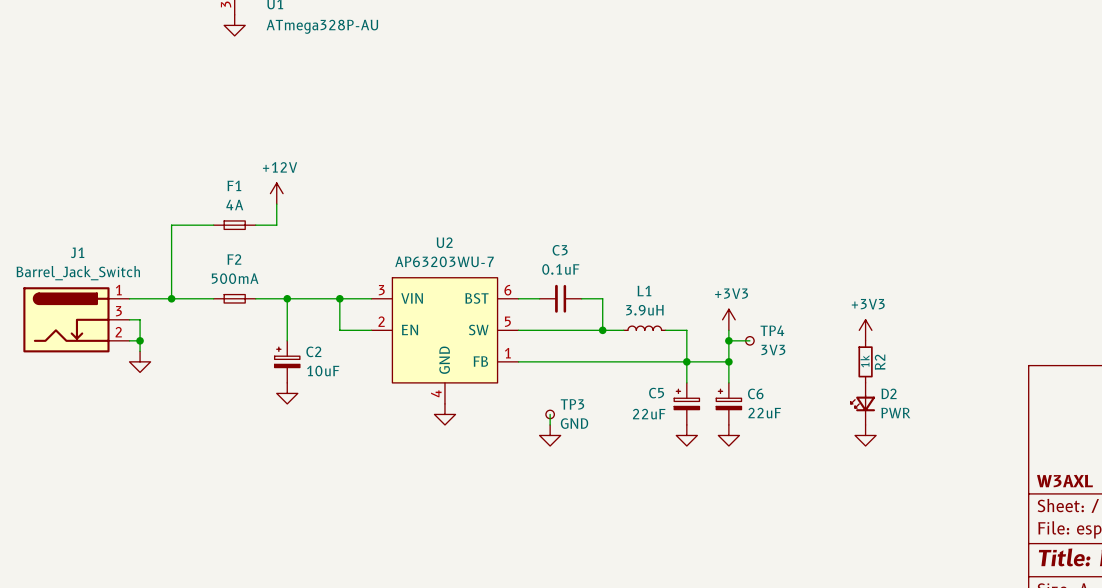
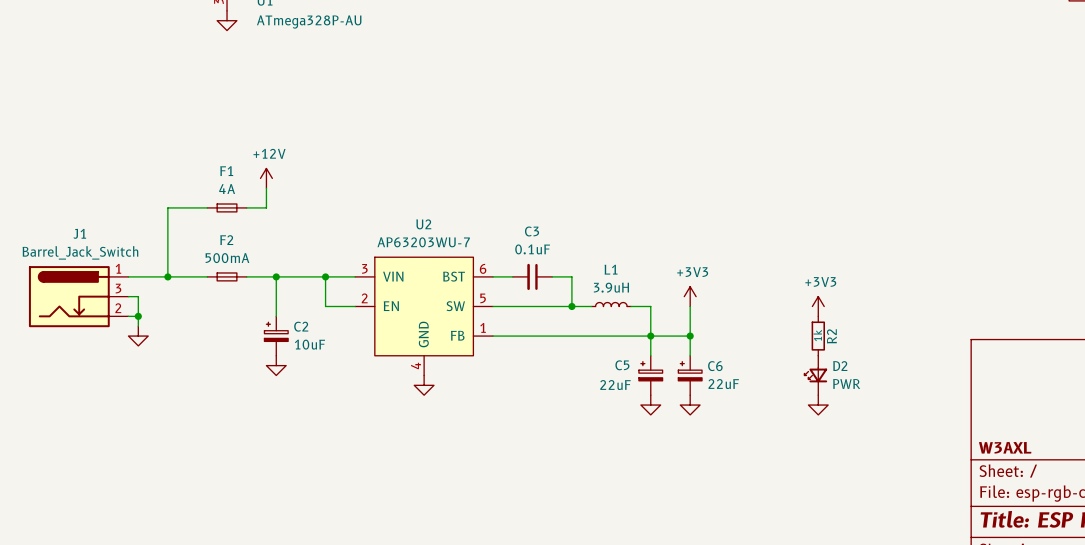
wire: (728, 340) (749, 340) -> none
junction: (728, 340) -> none
TP4: 3V3 (749, 340) -> none
wire: (550, 414) (550, 424) -> none
TP3: GND (550, 414) -> none
power symbol: (550, 435) -> none

